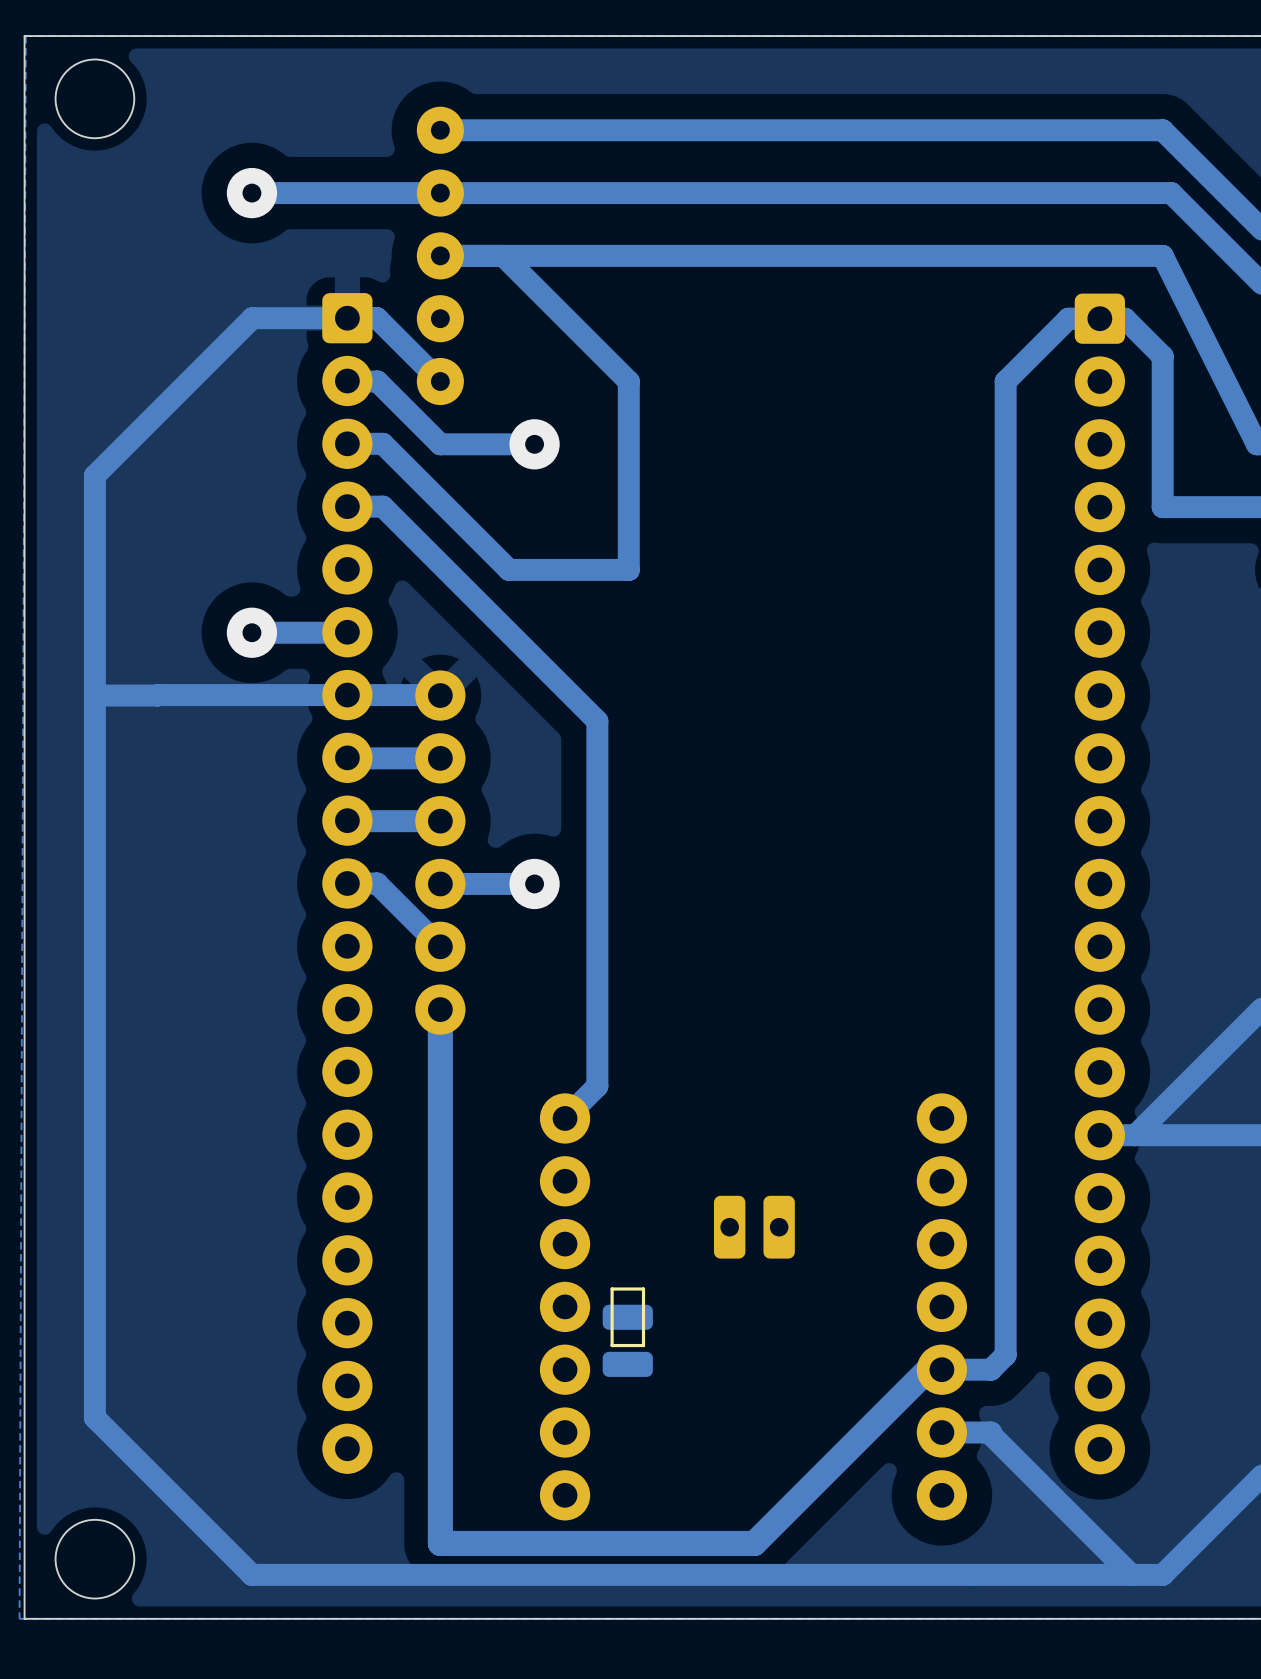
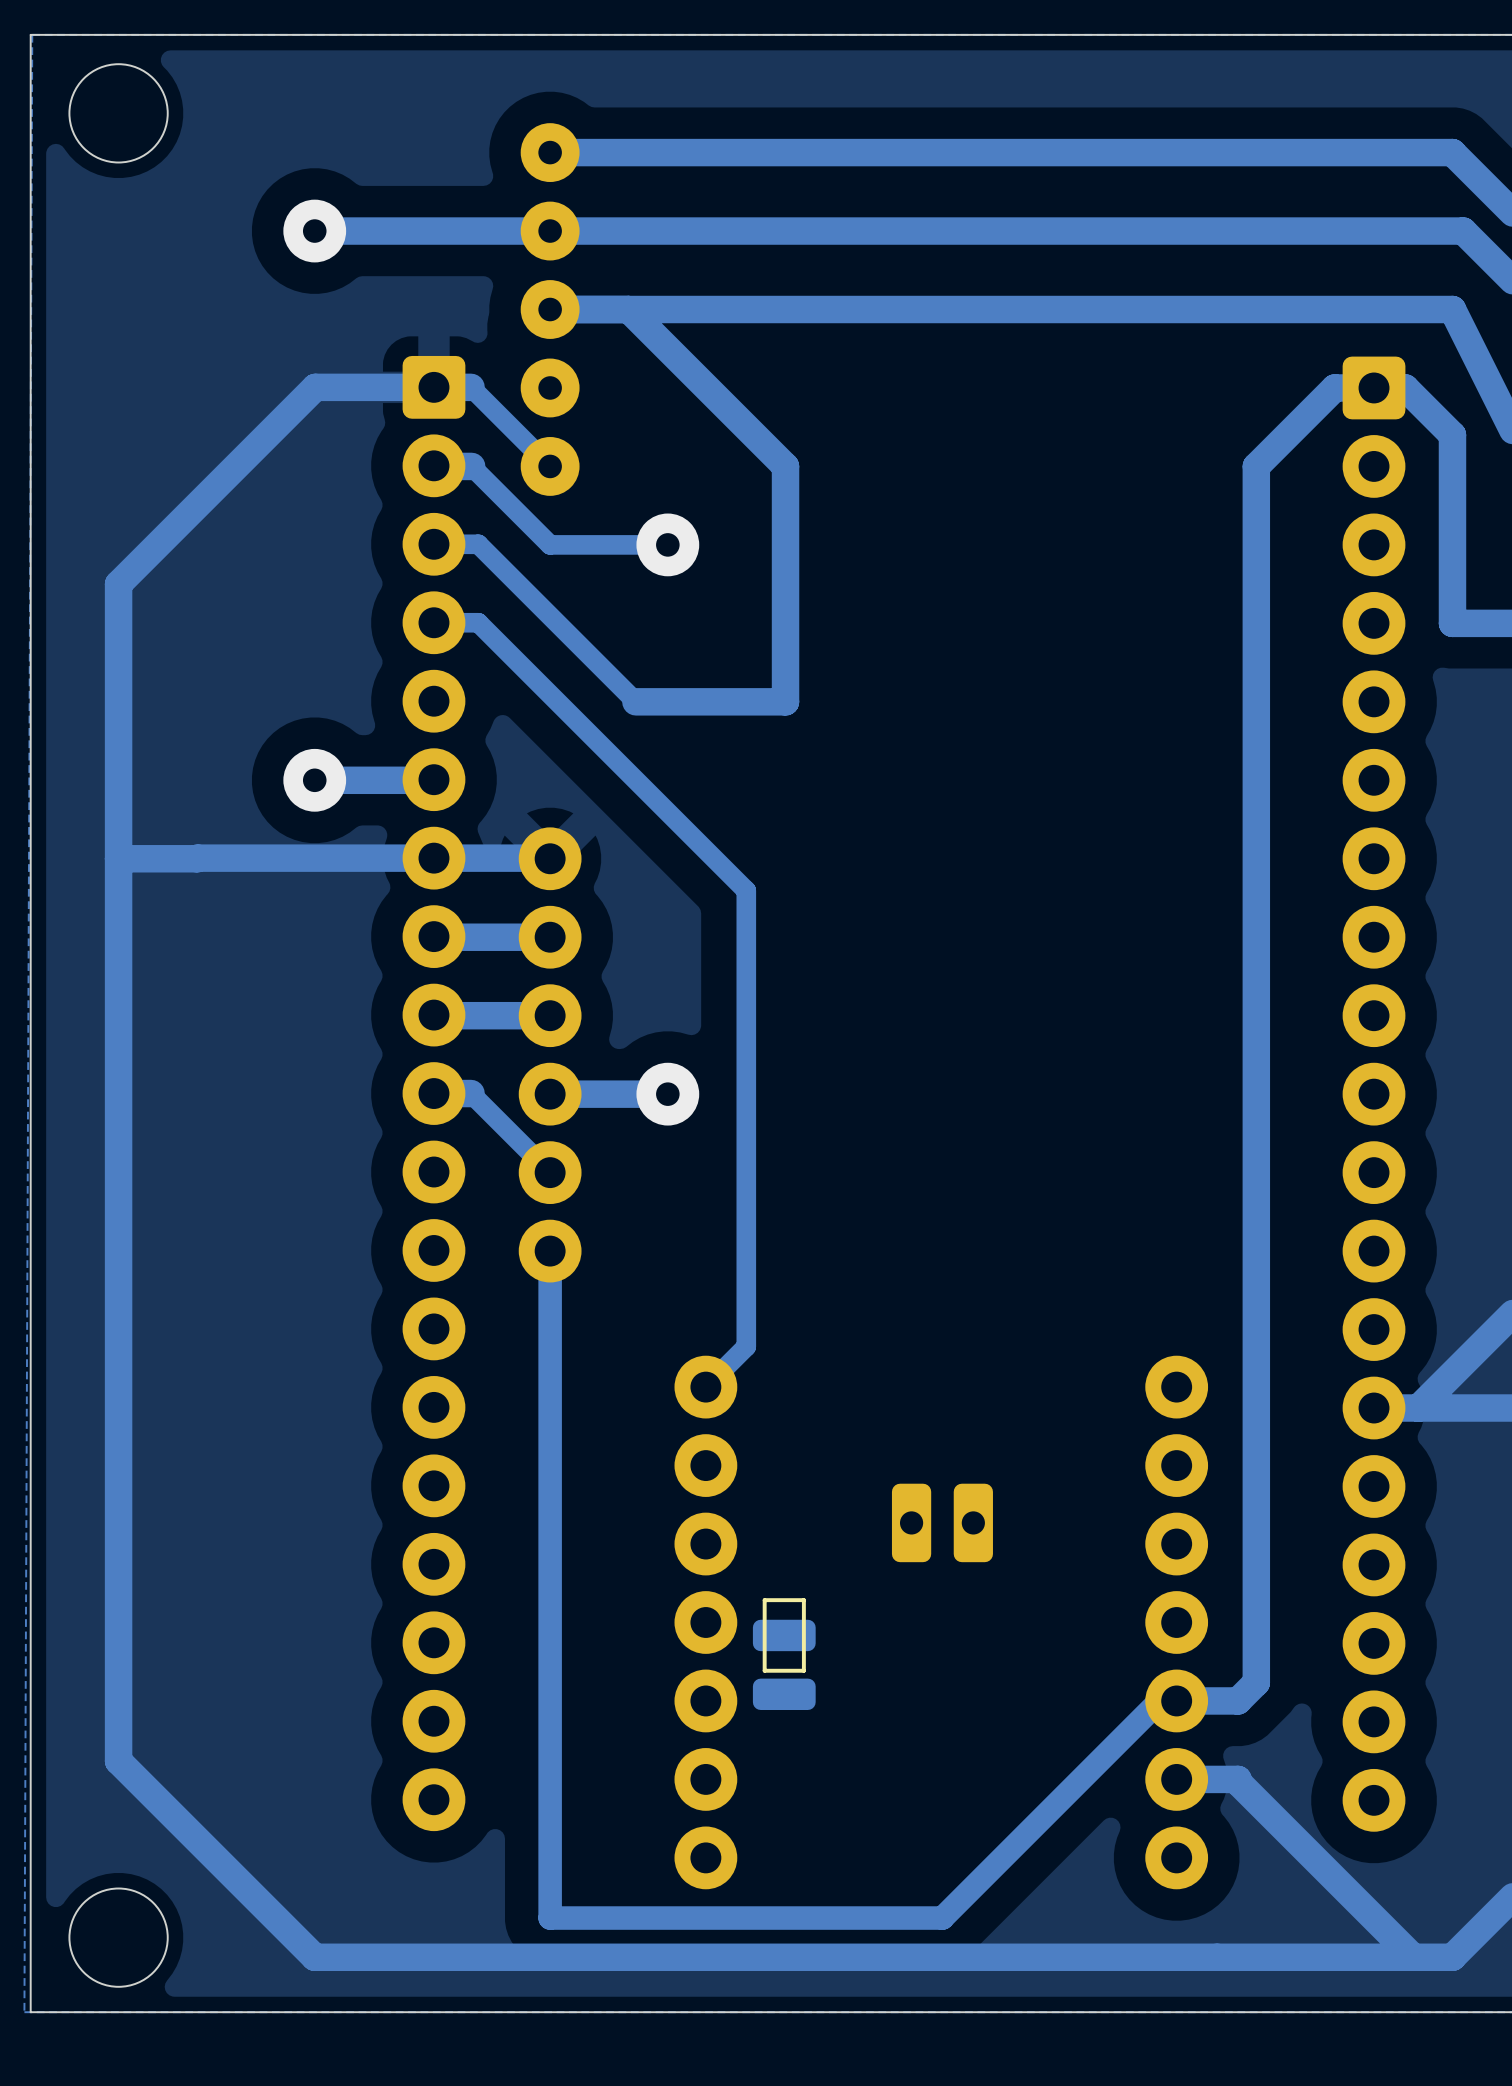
track width: thick (377, 318) (440, 381) -> thin (471, 387) (550, 466)
track width: thick (377, 381) (440, 444) (534, 444) -> thin (471, 466) (550, 544) (667, 544)
track width: thick (347, 443) (382, 443) (509, 569) -> thin (433, 544) (478, 544) (635, 701)
track width: thick (347, 506) (382, 506) (597, 721) (597, 1086) (565, 1118) -> thin (433, 622) (478, 622) (746, 890) (746, 1346) (705, 1387)
track width: thick (377, 883) (440, 946) -> thin (471, 1093) (550, 1172)
track width: thick (440, 1009) (440, 1543) (754, 1543) (928, 1369) -> thin (550, 1251) (550, 1918) (942, 1918) (1159, 1700)

